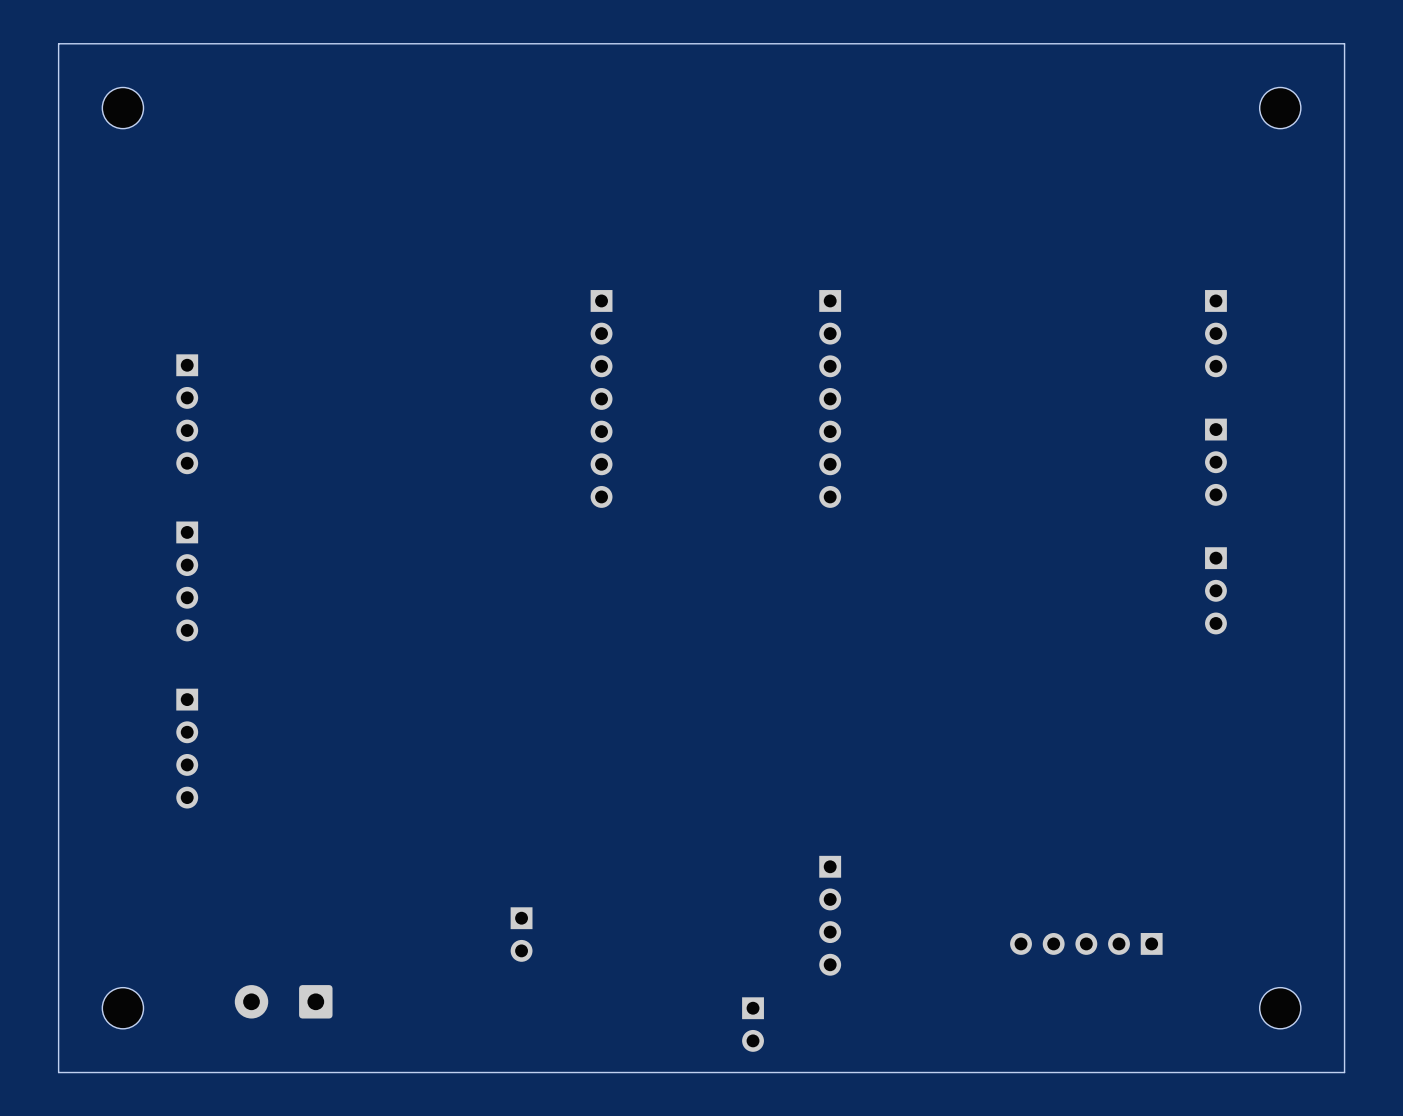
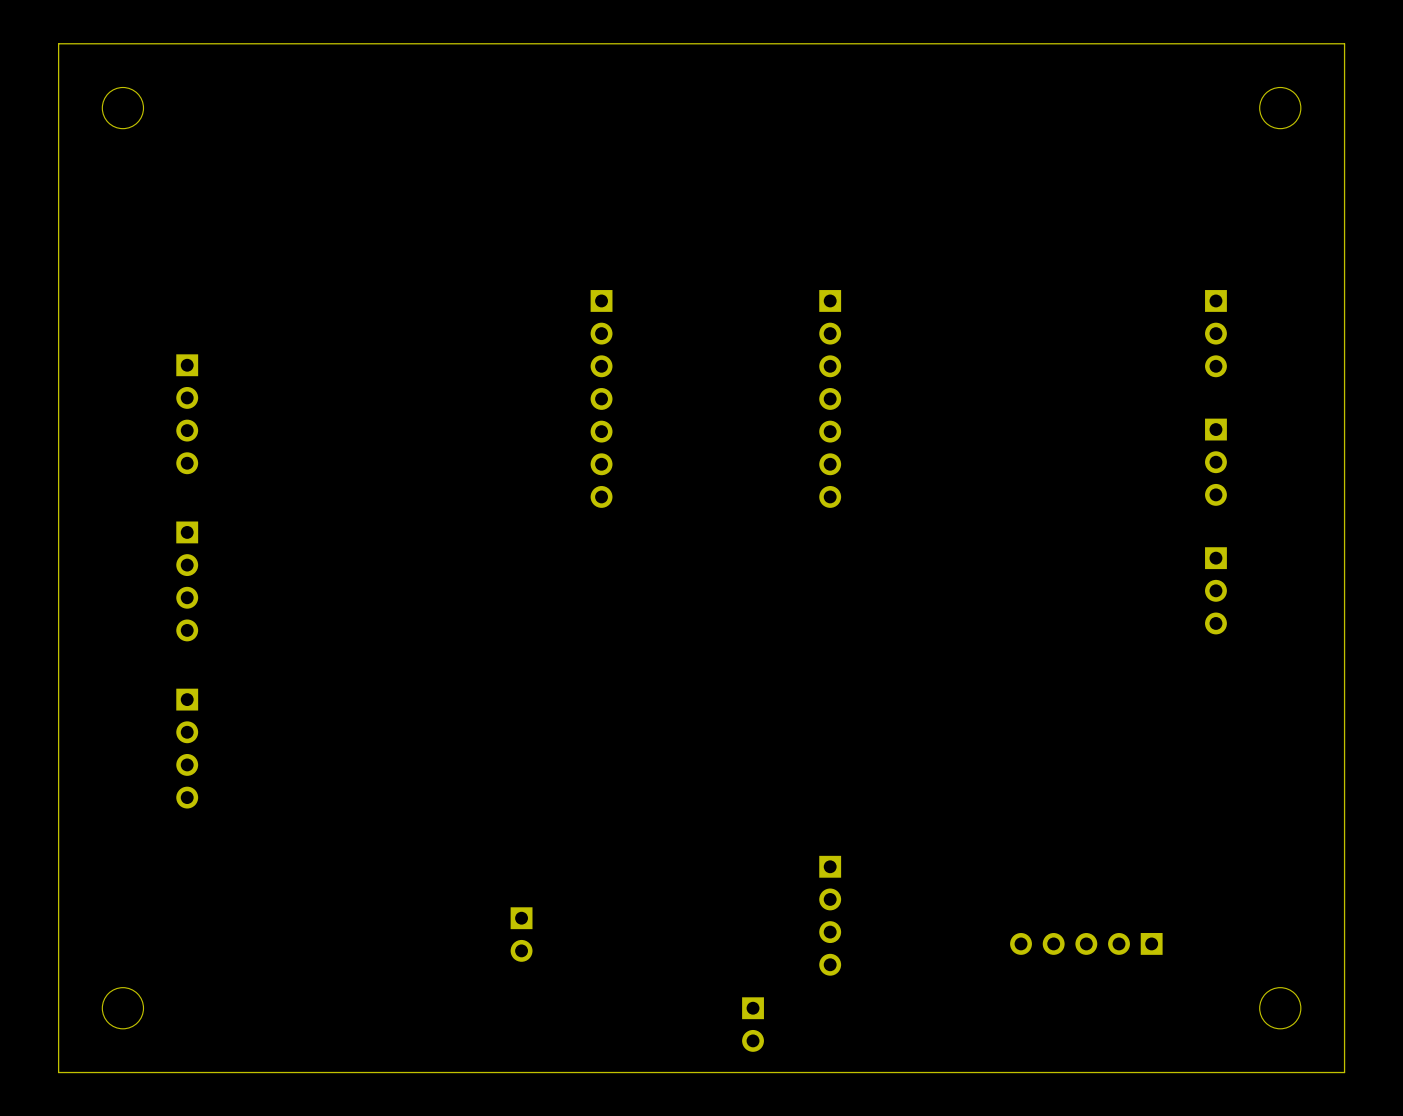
part: (283, 1001) -> none

